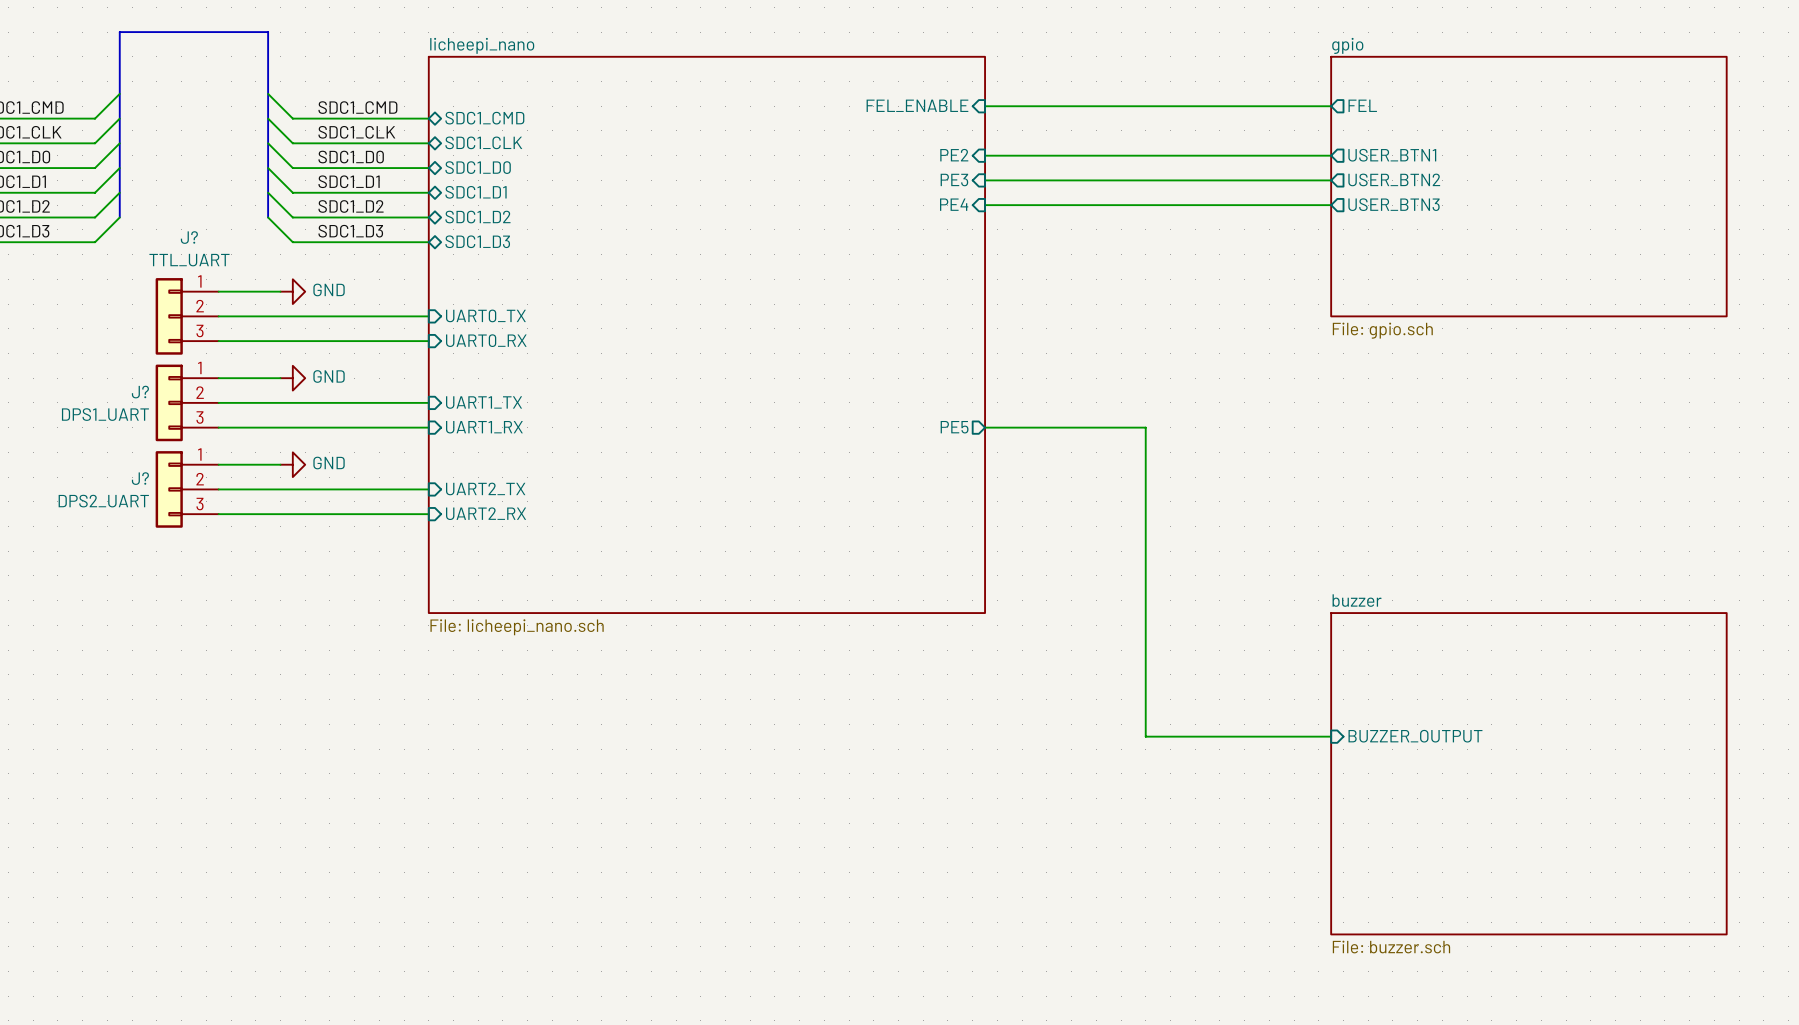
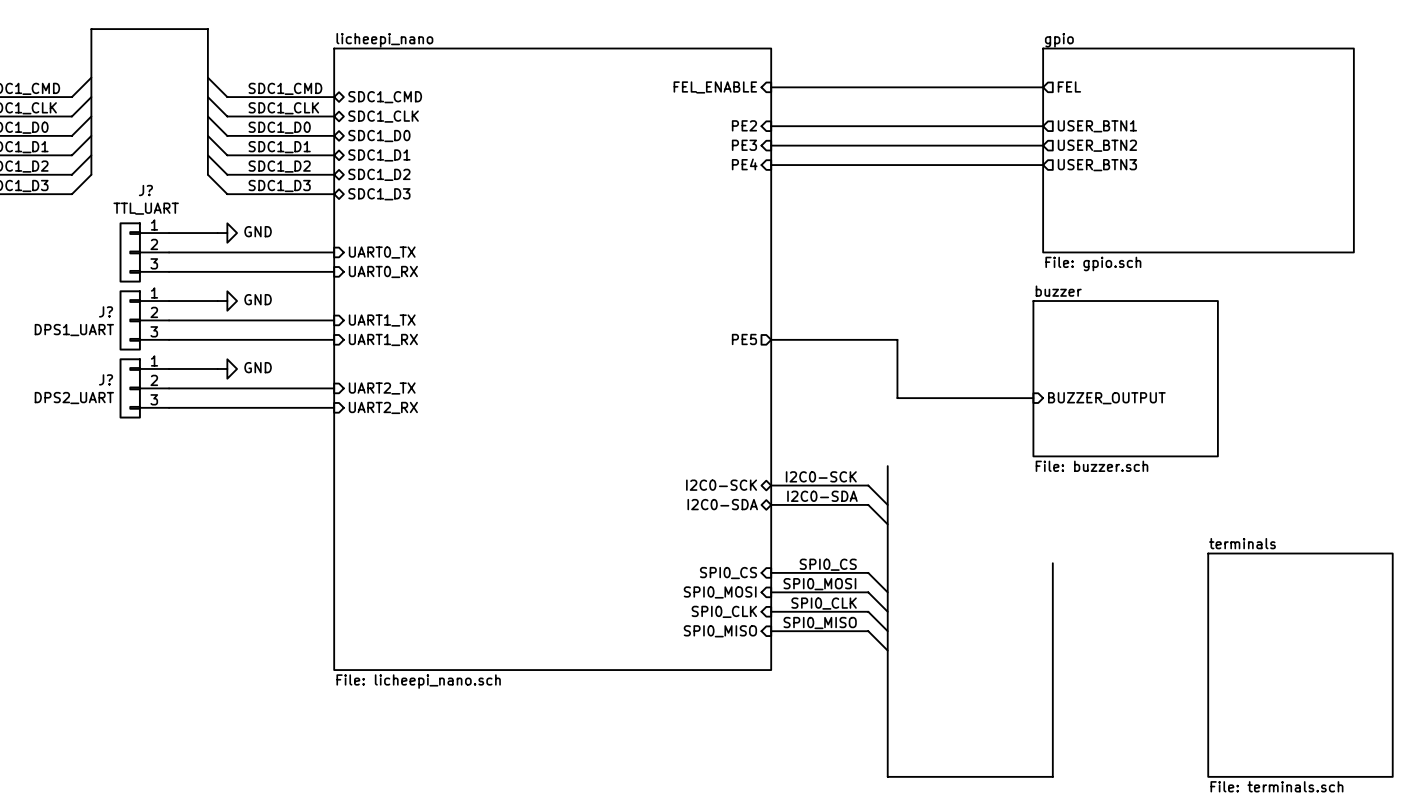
sheet licheepi_nano: File: licheepi_nano.sch (706, 334) -> none
sheet licheepi_nano: none -> File: licheepi_nano.sch (552, 359)
sheet buzzer: none -> File: buzzer.sch (1125, 378)
wire: (1145, 501) (1145, 736) (1331, 736) -> (897, 398) (1033, 398)
bus: none -> (887, 466) (887, 776) (1052, 776) (1052, 563)
label: none -> I2C0-SCK (821, 476)
sheet pin: none -> I2C0-SCK (721, 485)
wire: none -> (771, 485) (868, 485) (887, 504)
label: none -> I2C0-SDA (822, 496)
sheet pin: none -> I2C0-SDA (722, 504)
wire: none -> (771, 504) (868, 504) (887, 524)
label: none -> SPI0_CS (828, 564)
sheet pin: none -> SPI0_CS (728, 573)
wire: none -> (771, 572) (868, 572) (887, 592)
sheet pin position: BUZZER_OUTPUT (1415, 736) -> BUZZER_OUTPUT (1106, 398)
label: none -> SPI0_MOSI (819, 584)
sheet pin: none -> SPI0_MOSI (720, 592)
wire: none -> (771, 592) (868, 592) (887, 611)
label: none -> SPI0_CLK (824, 603)
sheet pin: none -> SPI0_CLK (724, 611)
wire: none -> (771, 611) (868, 611) (887, 631)
sheet buzzer: File: buzzer.sch (1528, 773) -> none
label: none -> SPI0_MISO (820, 623)
sheet pin: none -> SPI0_MISO (720, 631)
wire: none -> (771, 631) (868, 631) (887, 650)
sheet terminals: none -> File: terminals.sch (1300, 665)

